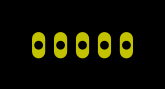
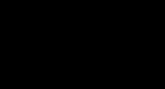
part: (82, 45) -> none

